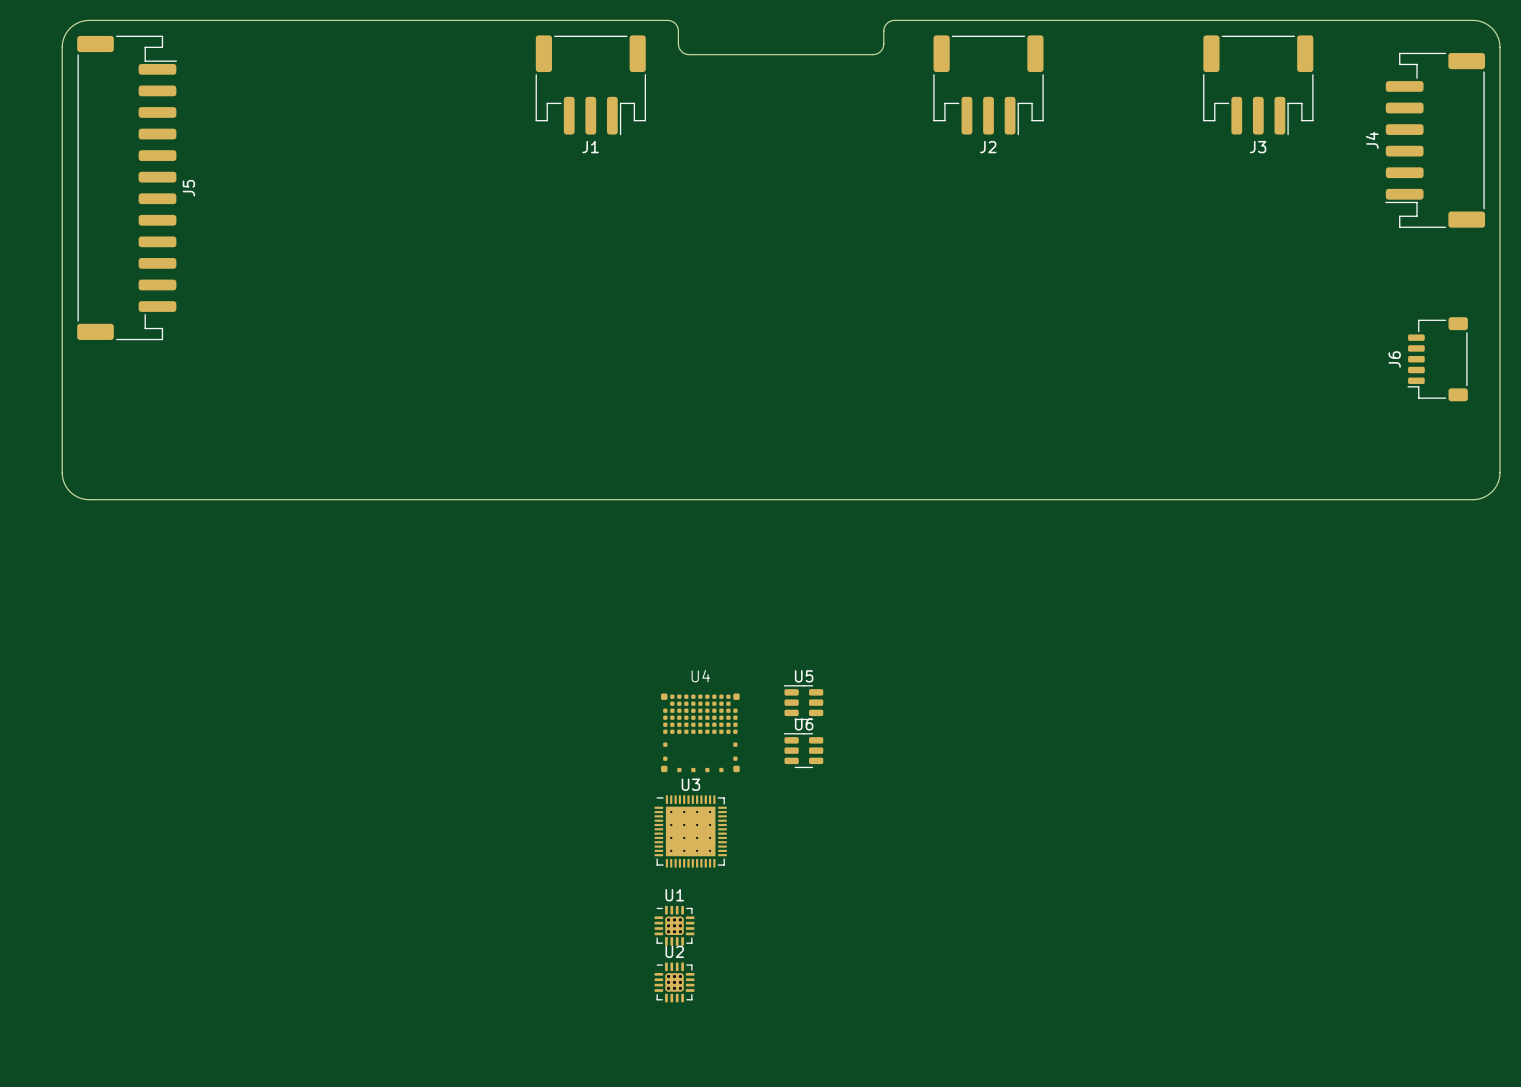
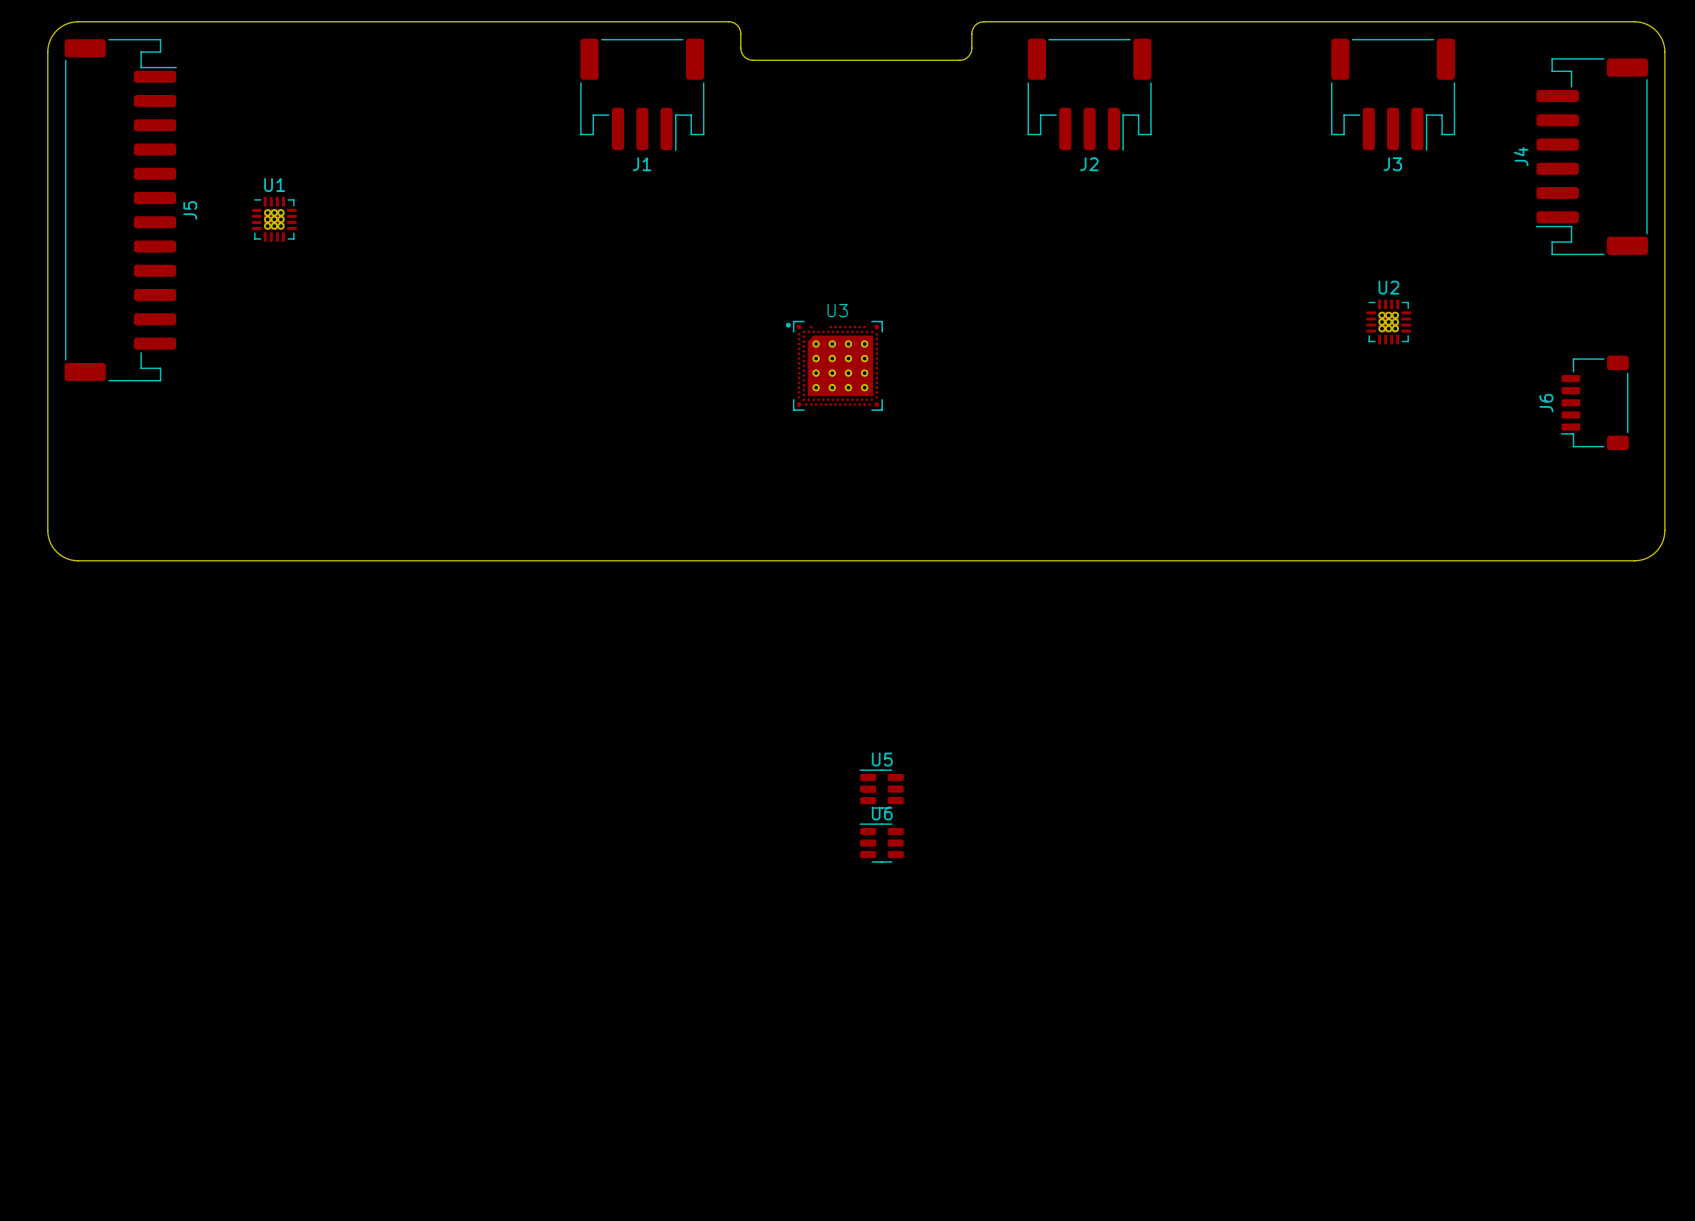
U4: (700, 732) -> none
U3 footprint: [654, 795, 727, 868] -> [785, 320, 883, 411]
U1 position: (674, 925) -> (274, 219)
U2 position: (674, 982) -> (1388, 322)

